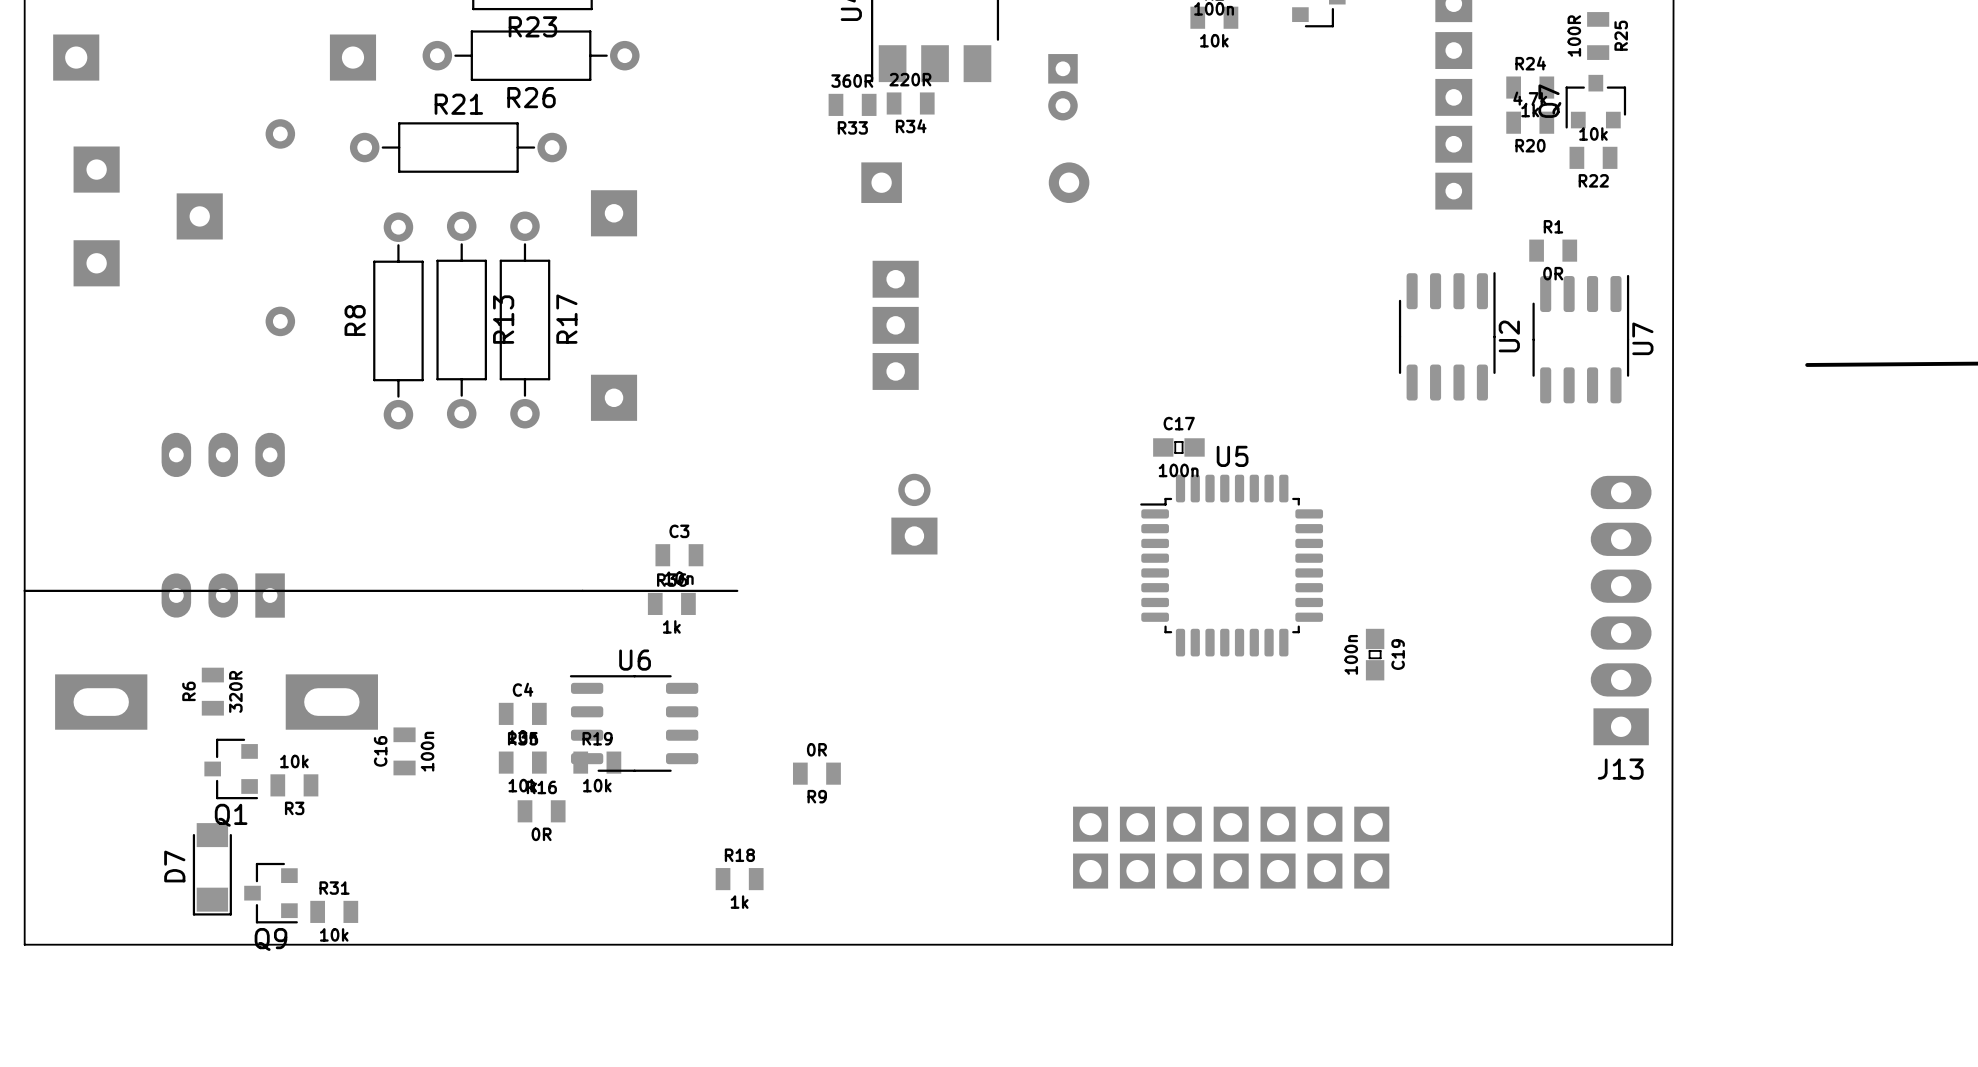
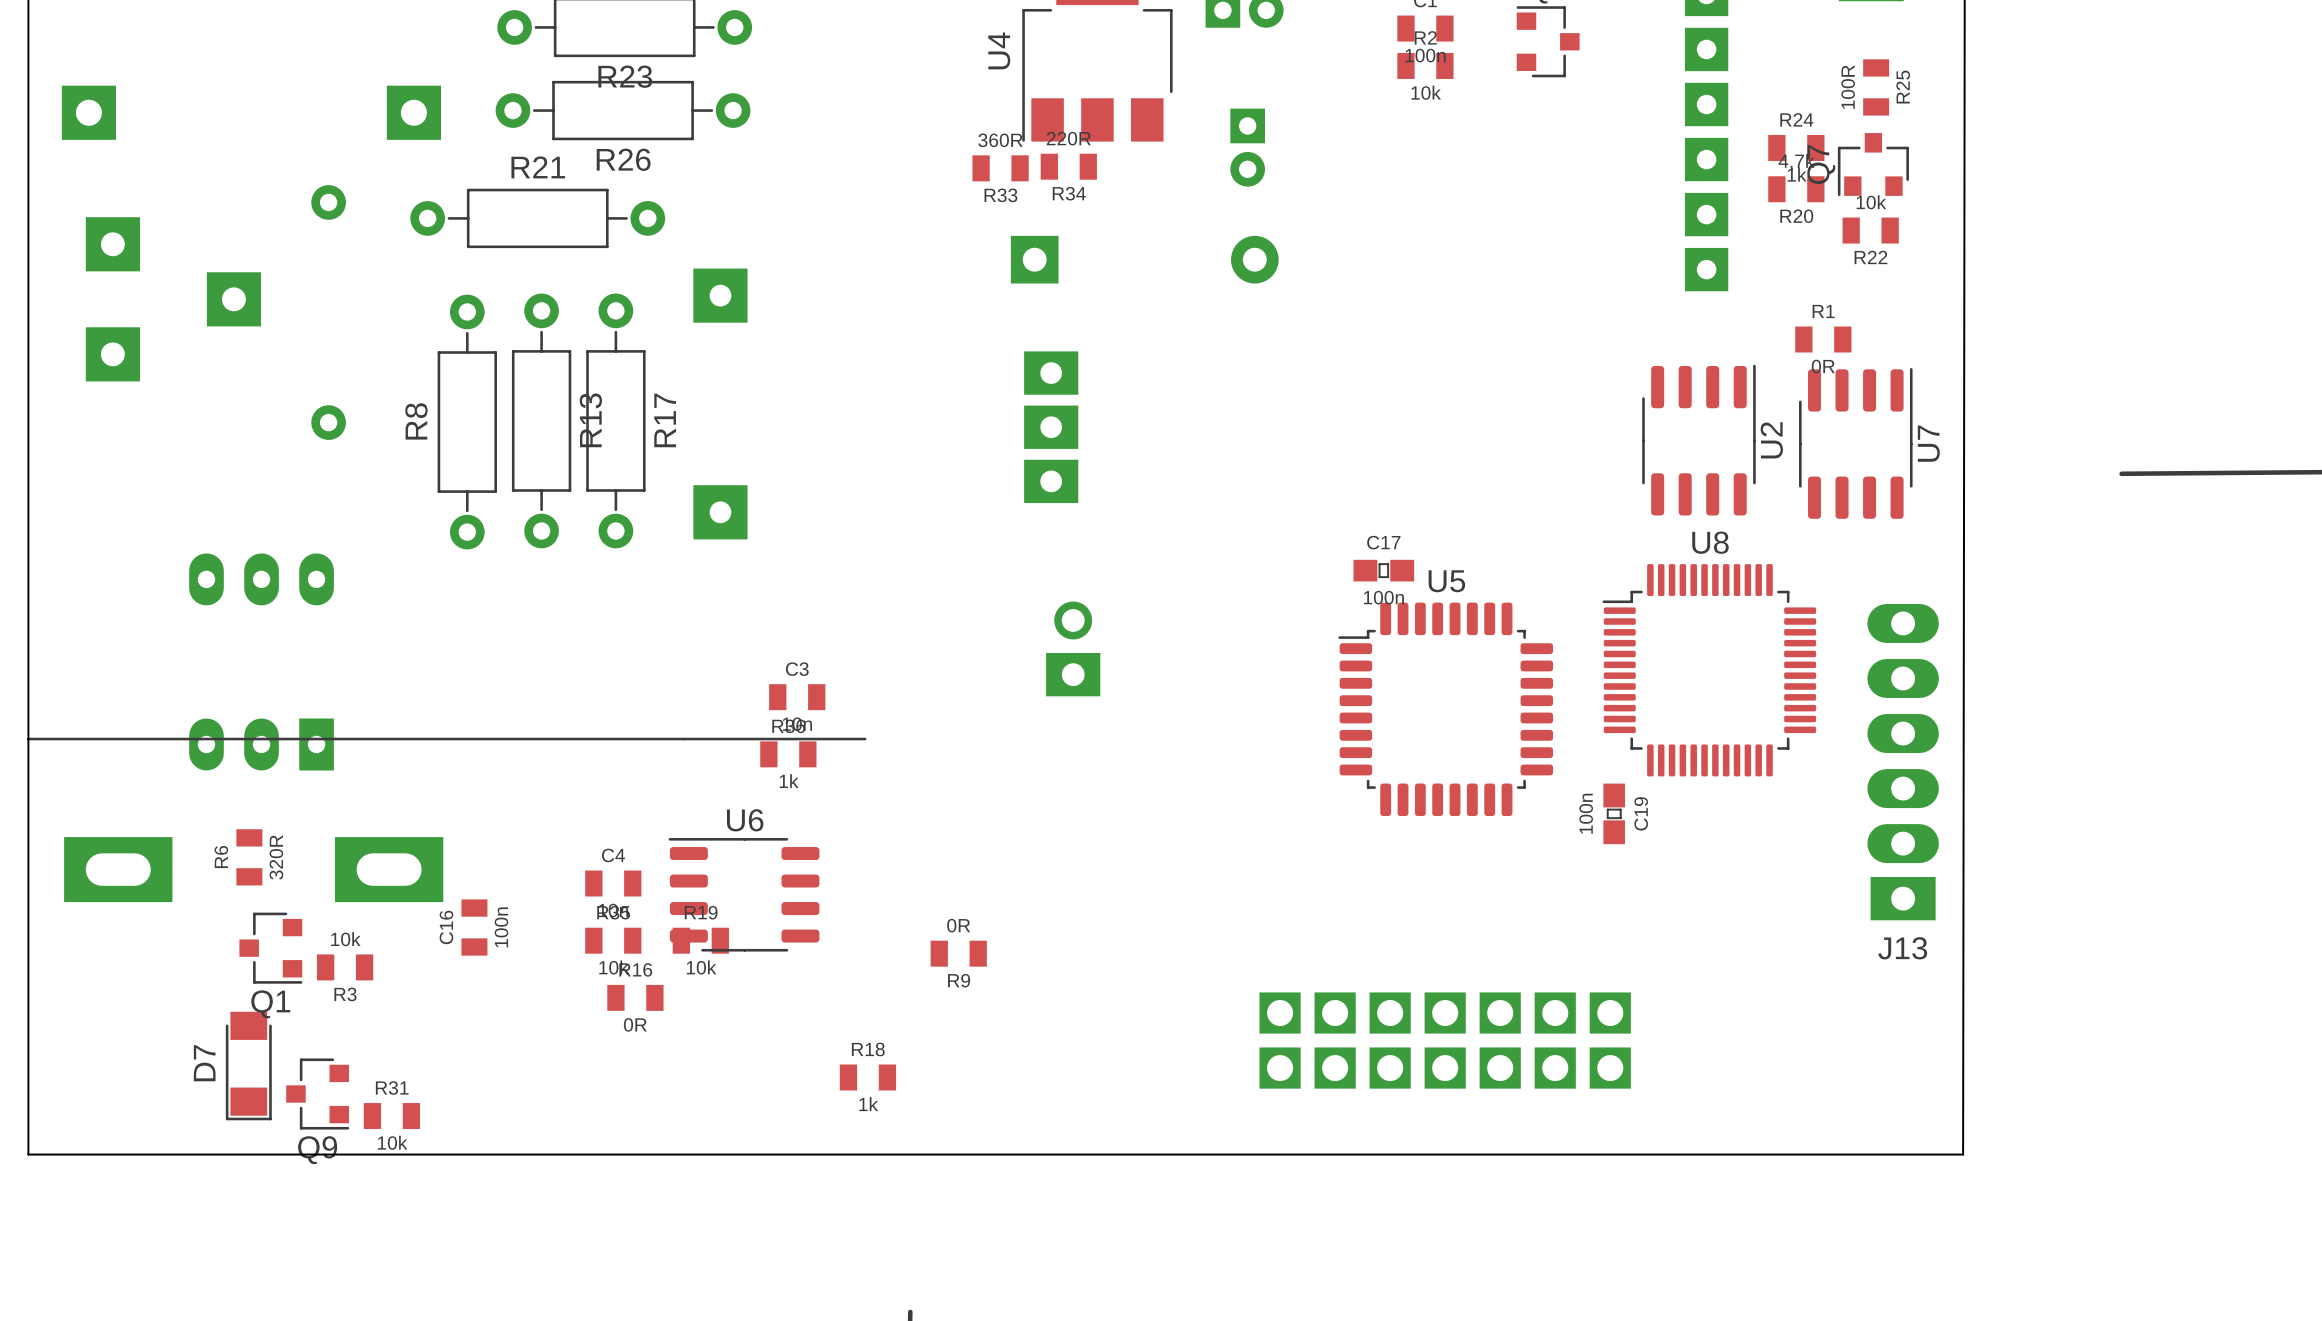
U8: none -> (1709, 670)

